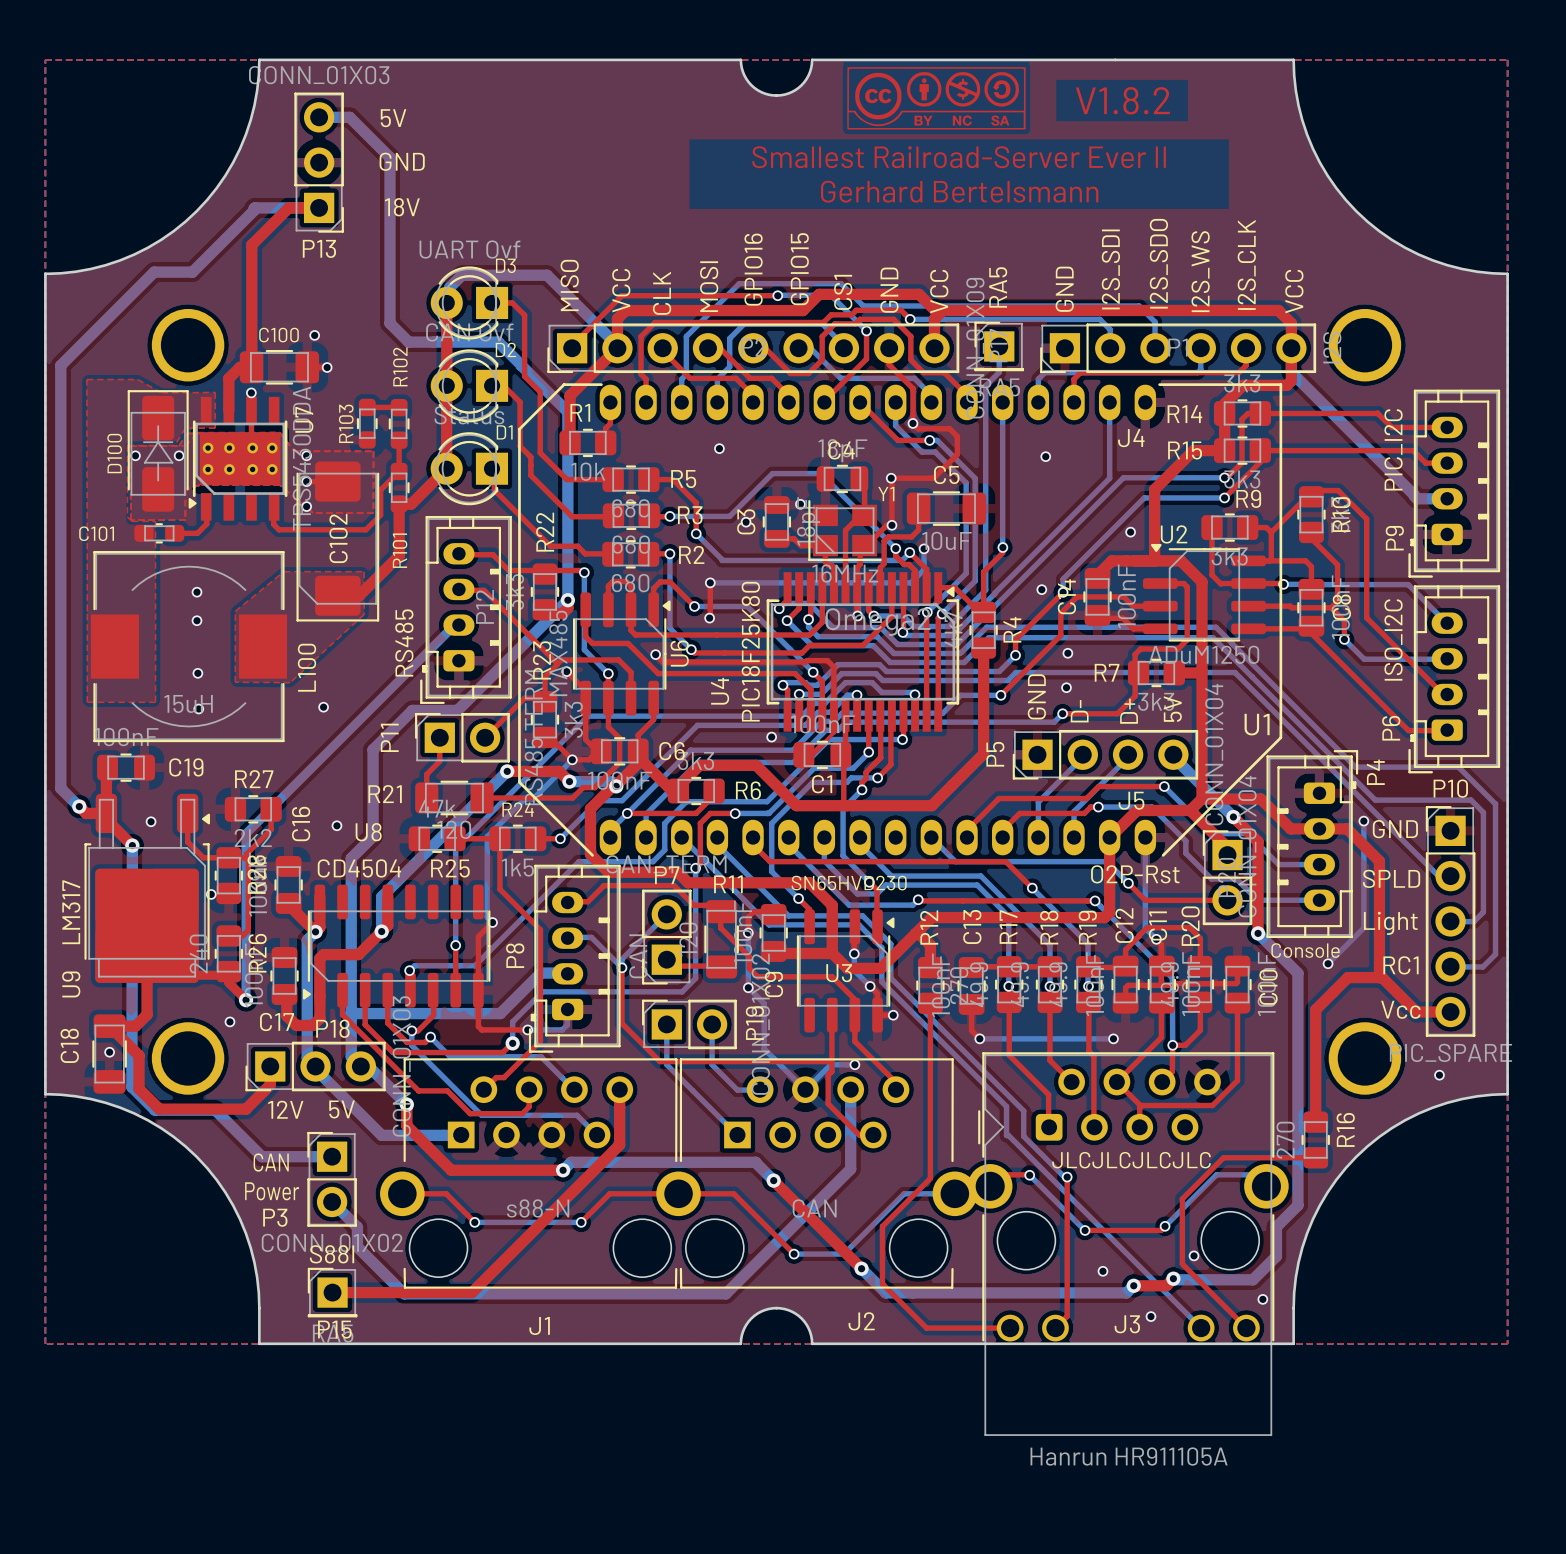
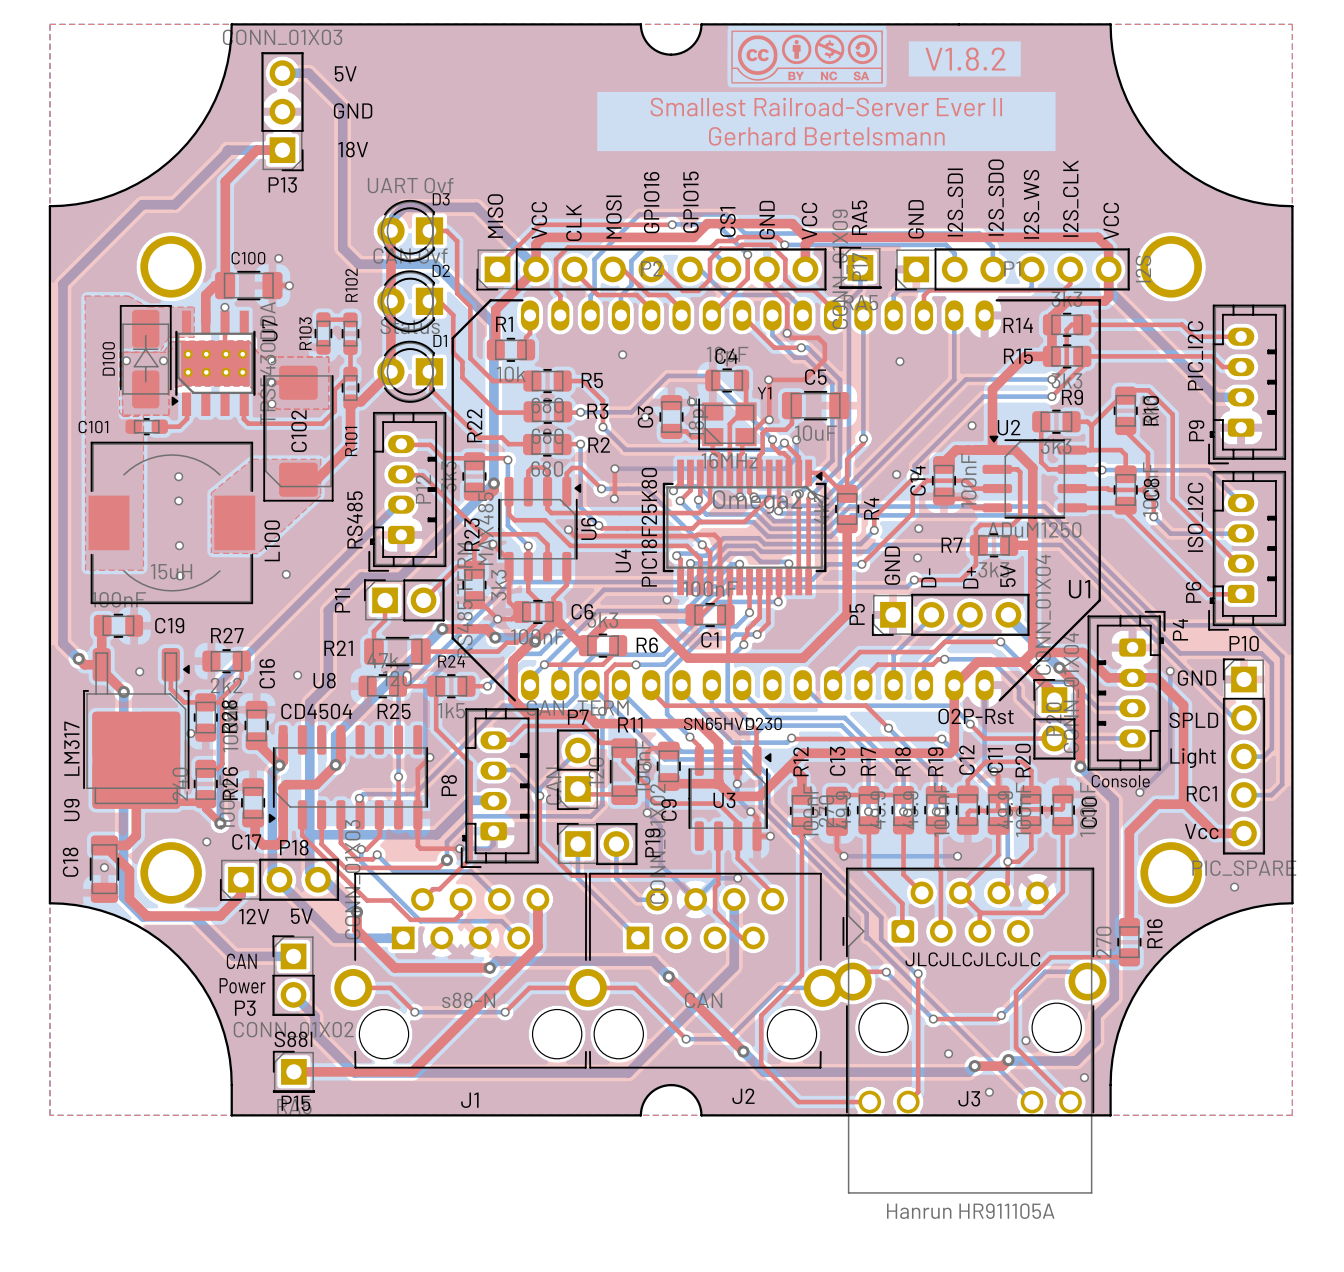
J4: (1131, 438) -> none
J5: (1131, 800) -> none

